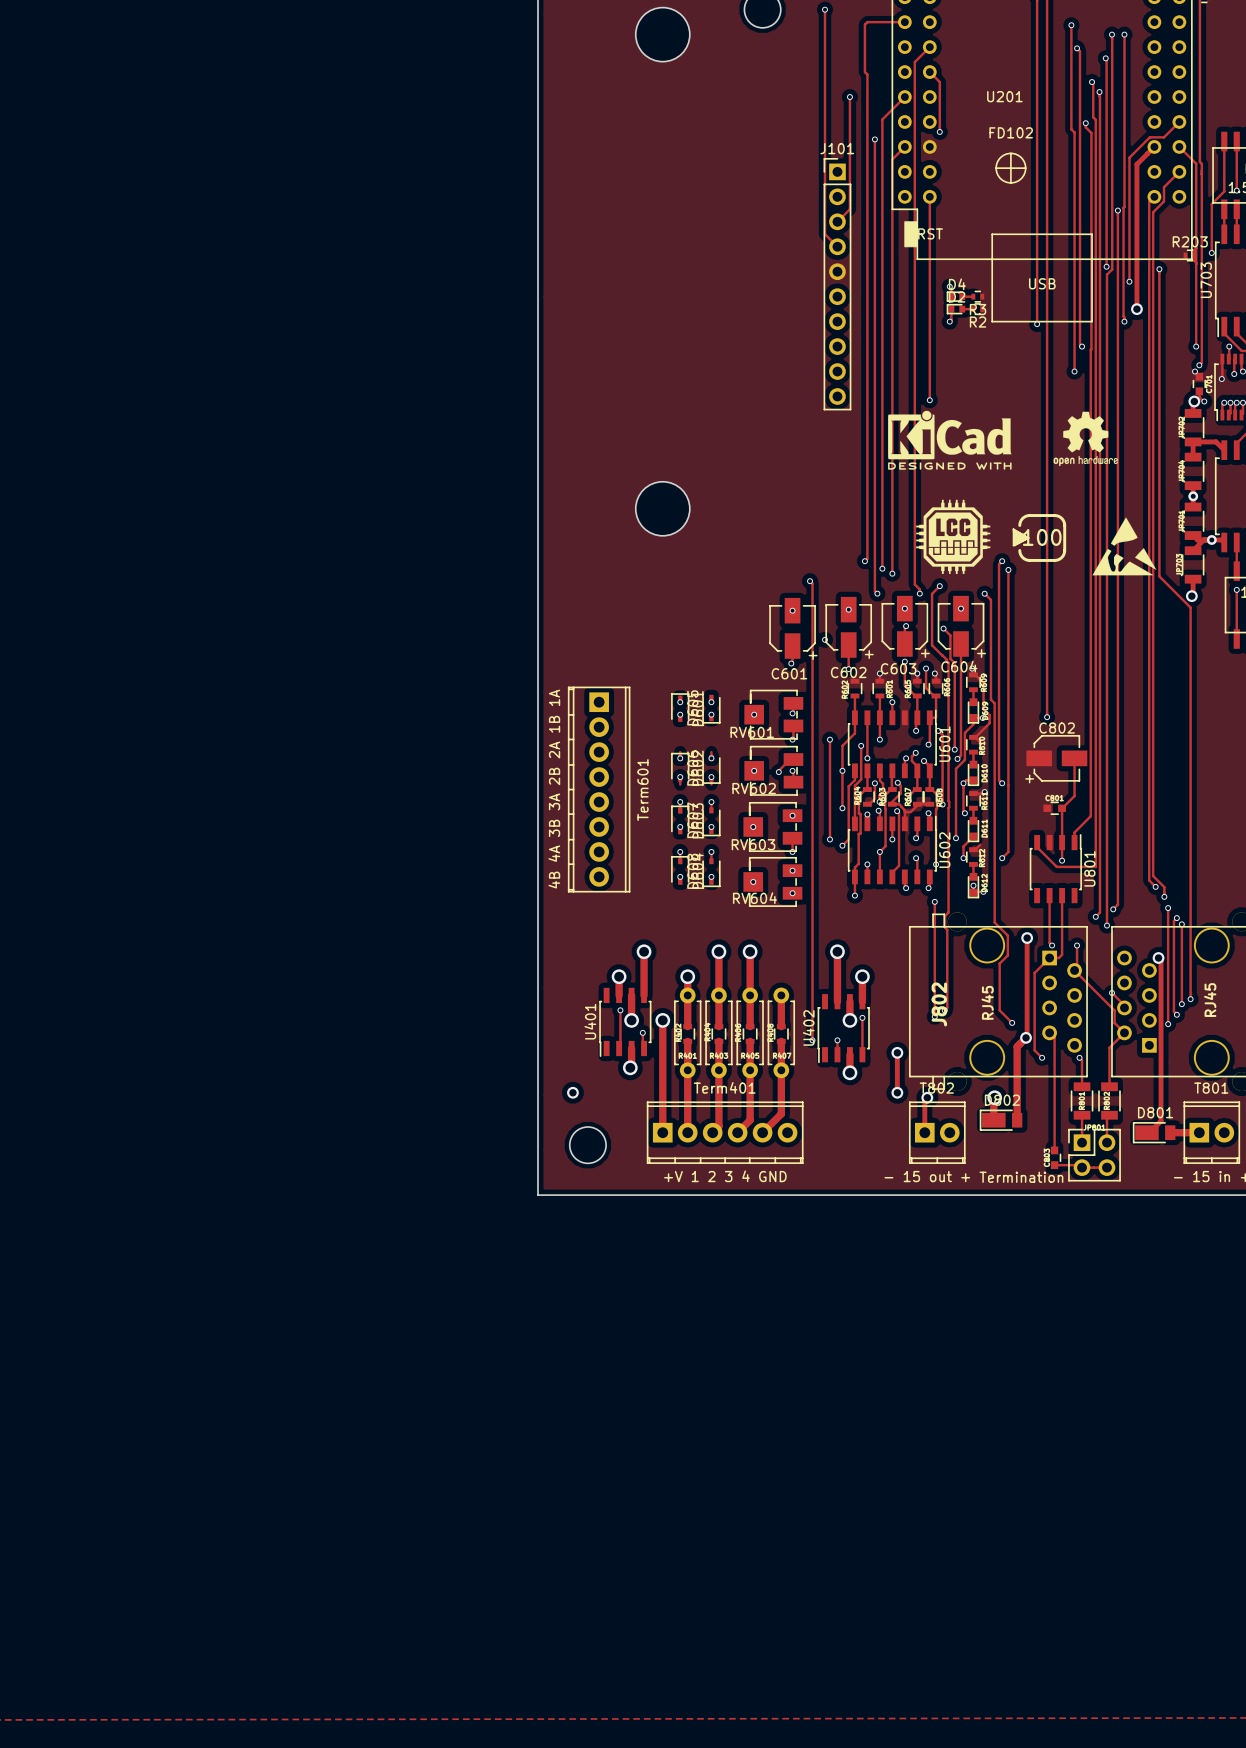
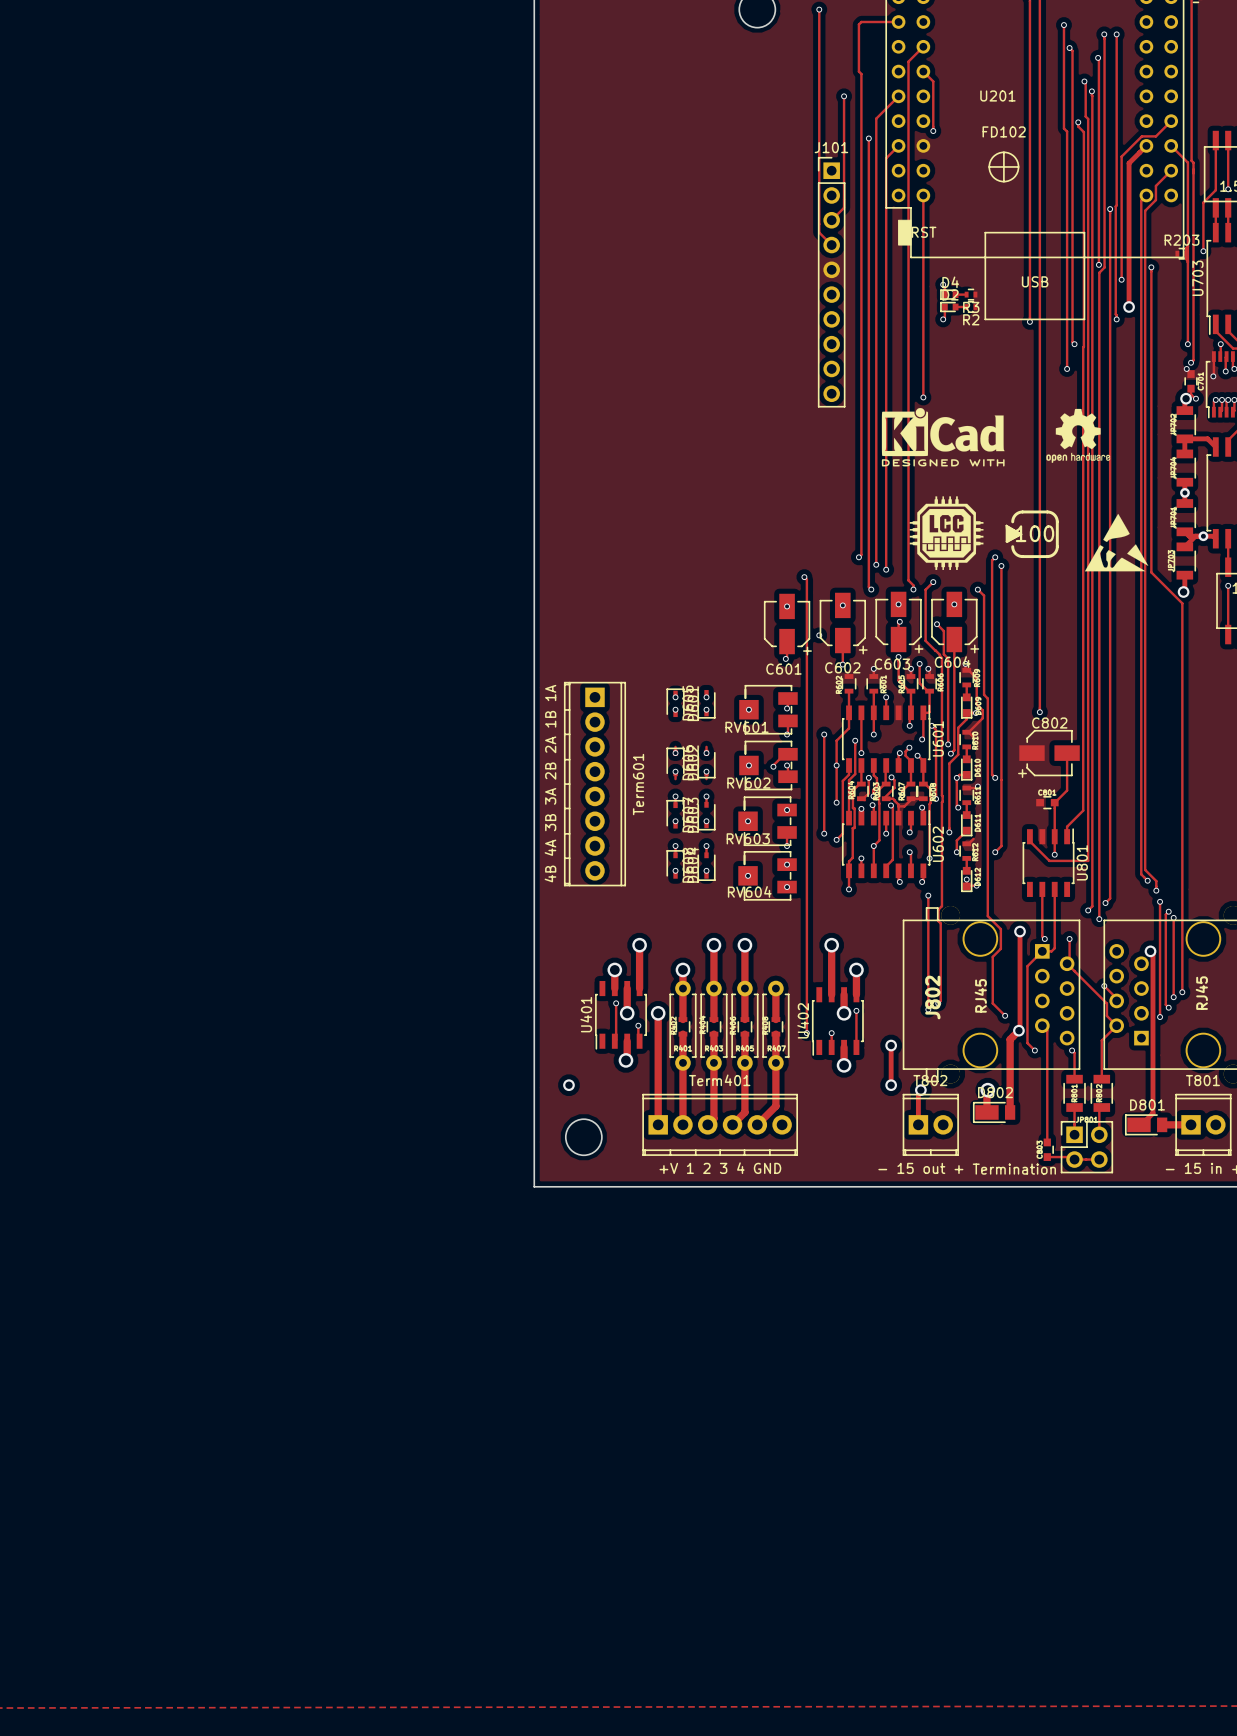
part: (662, 34) -> none
part: (662, 508) -> none

